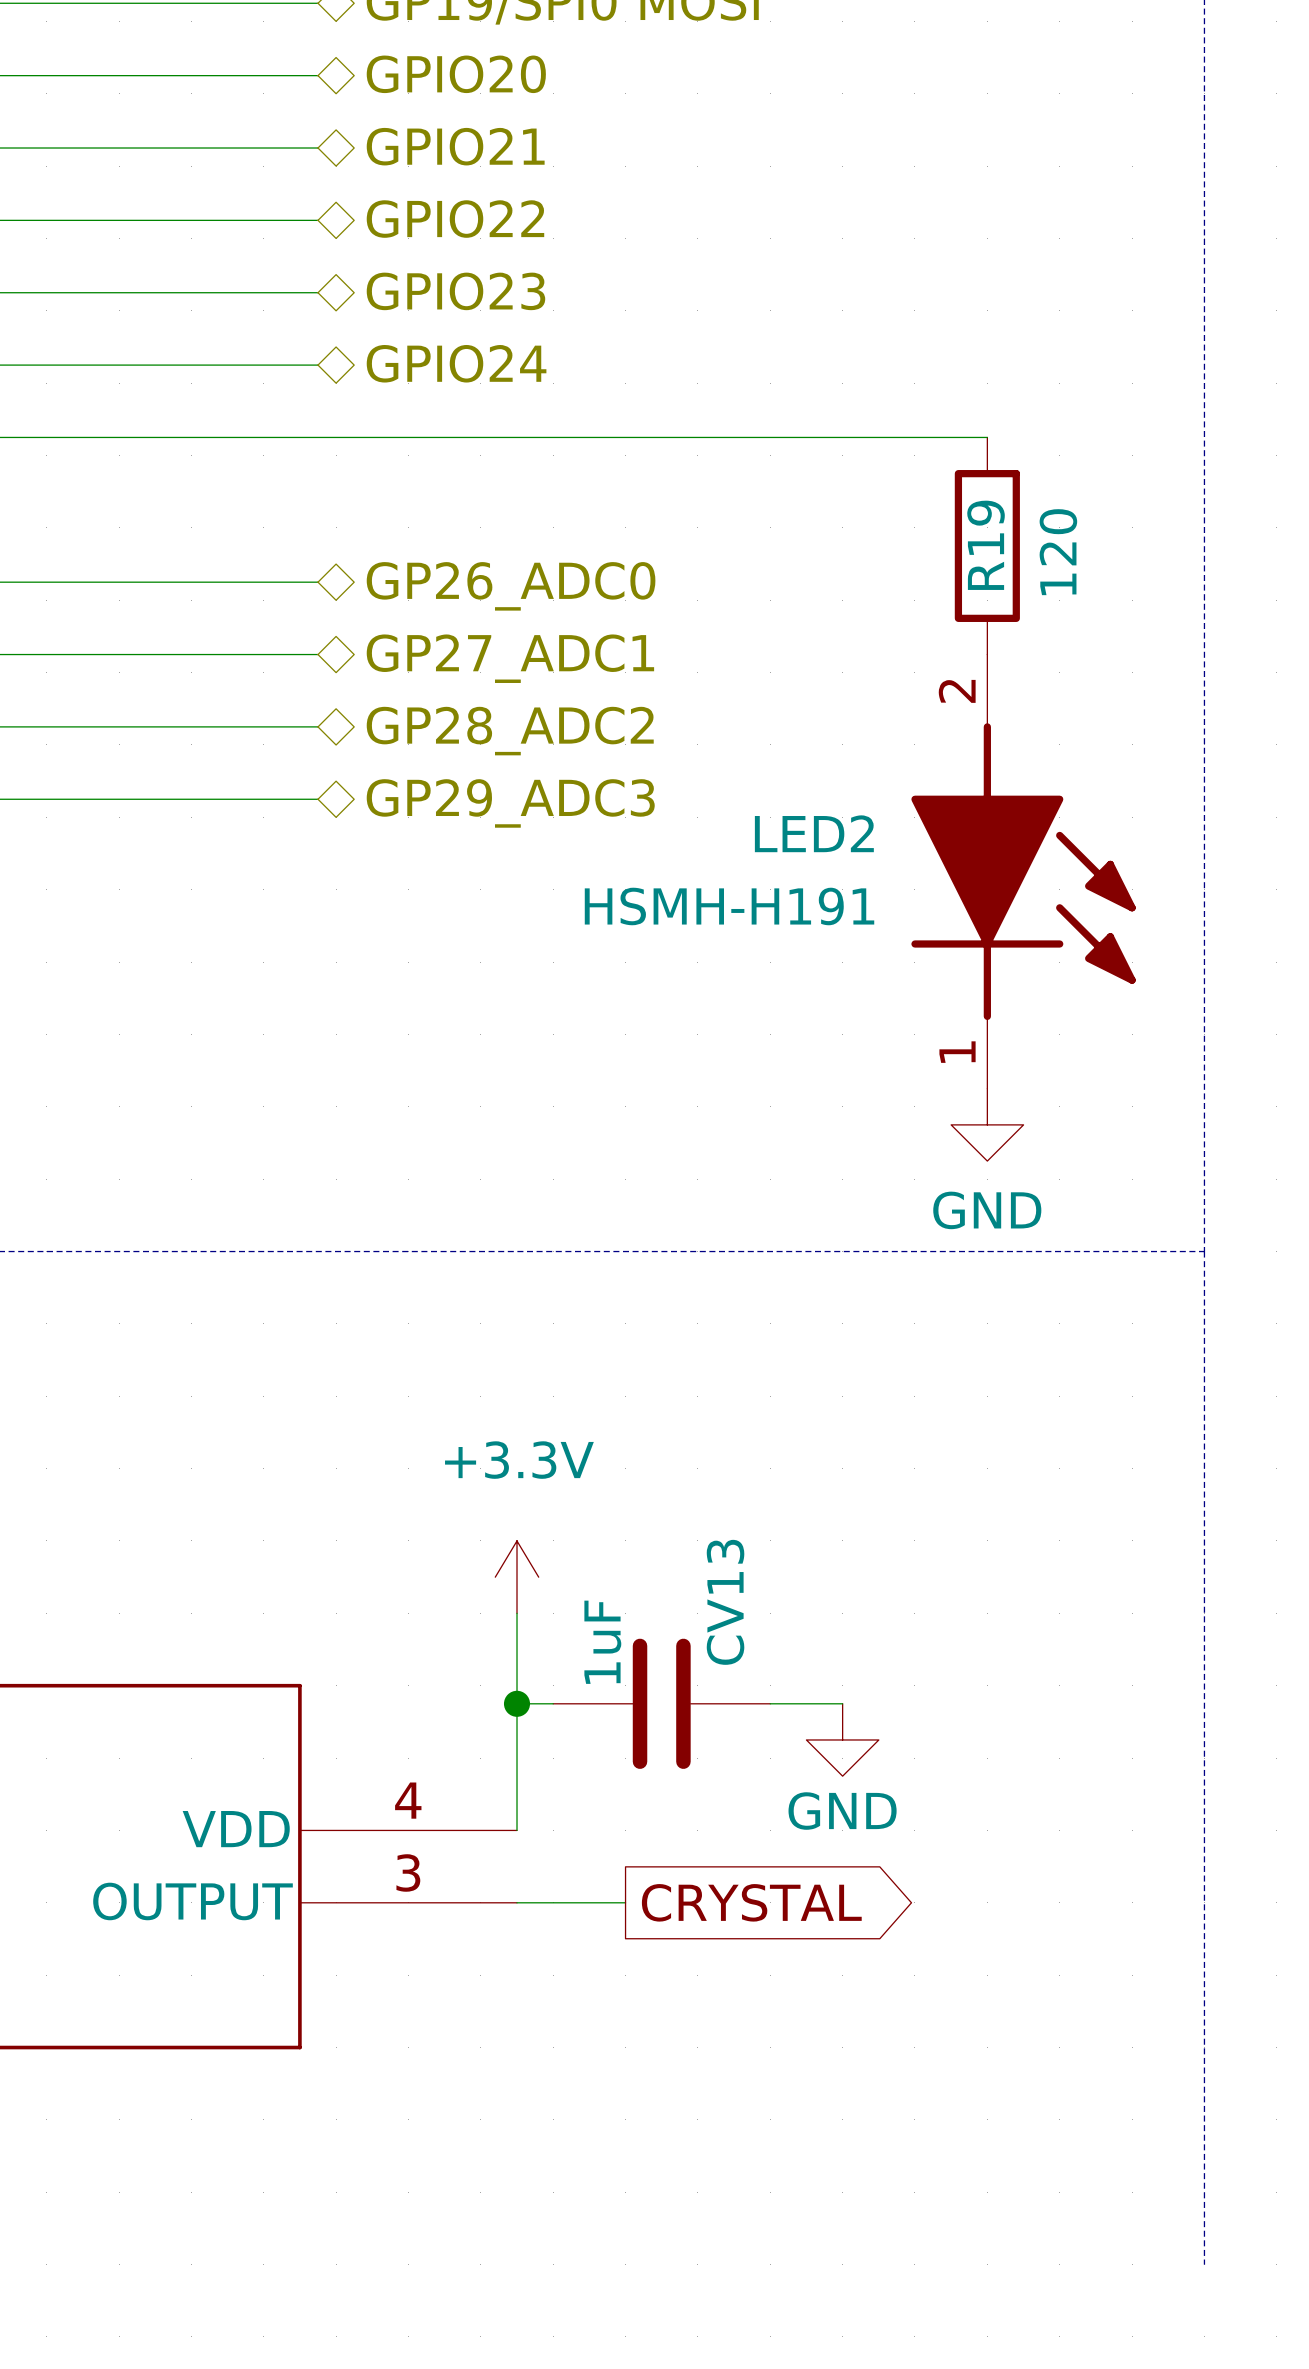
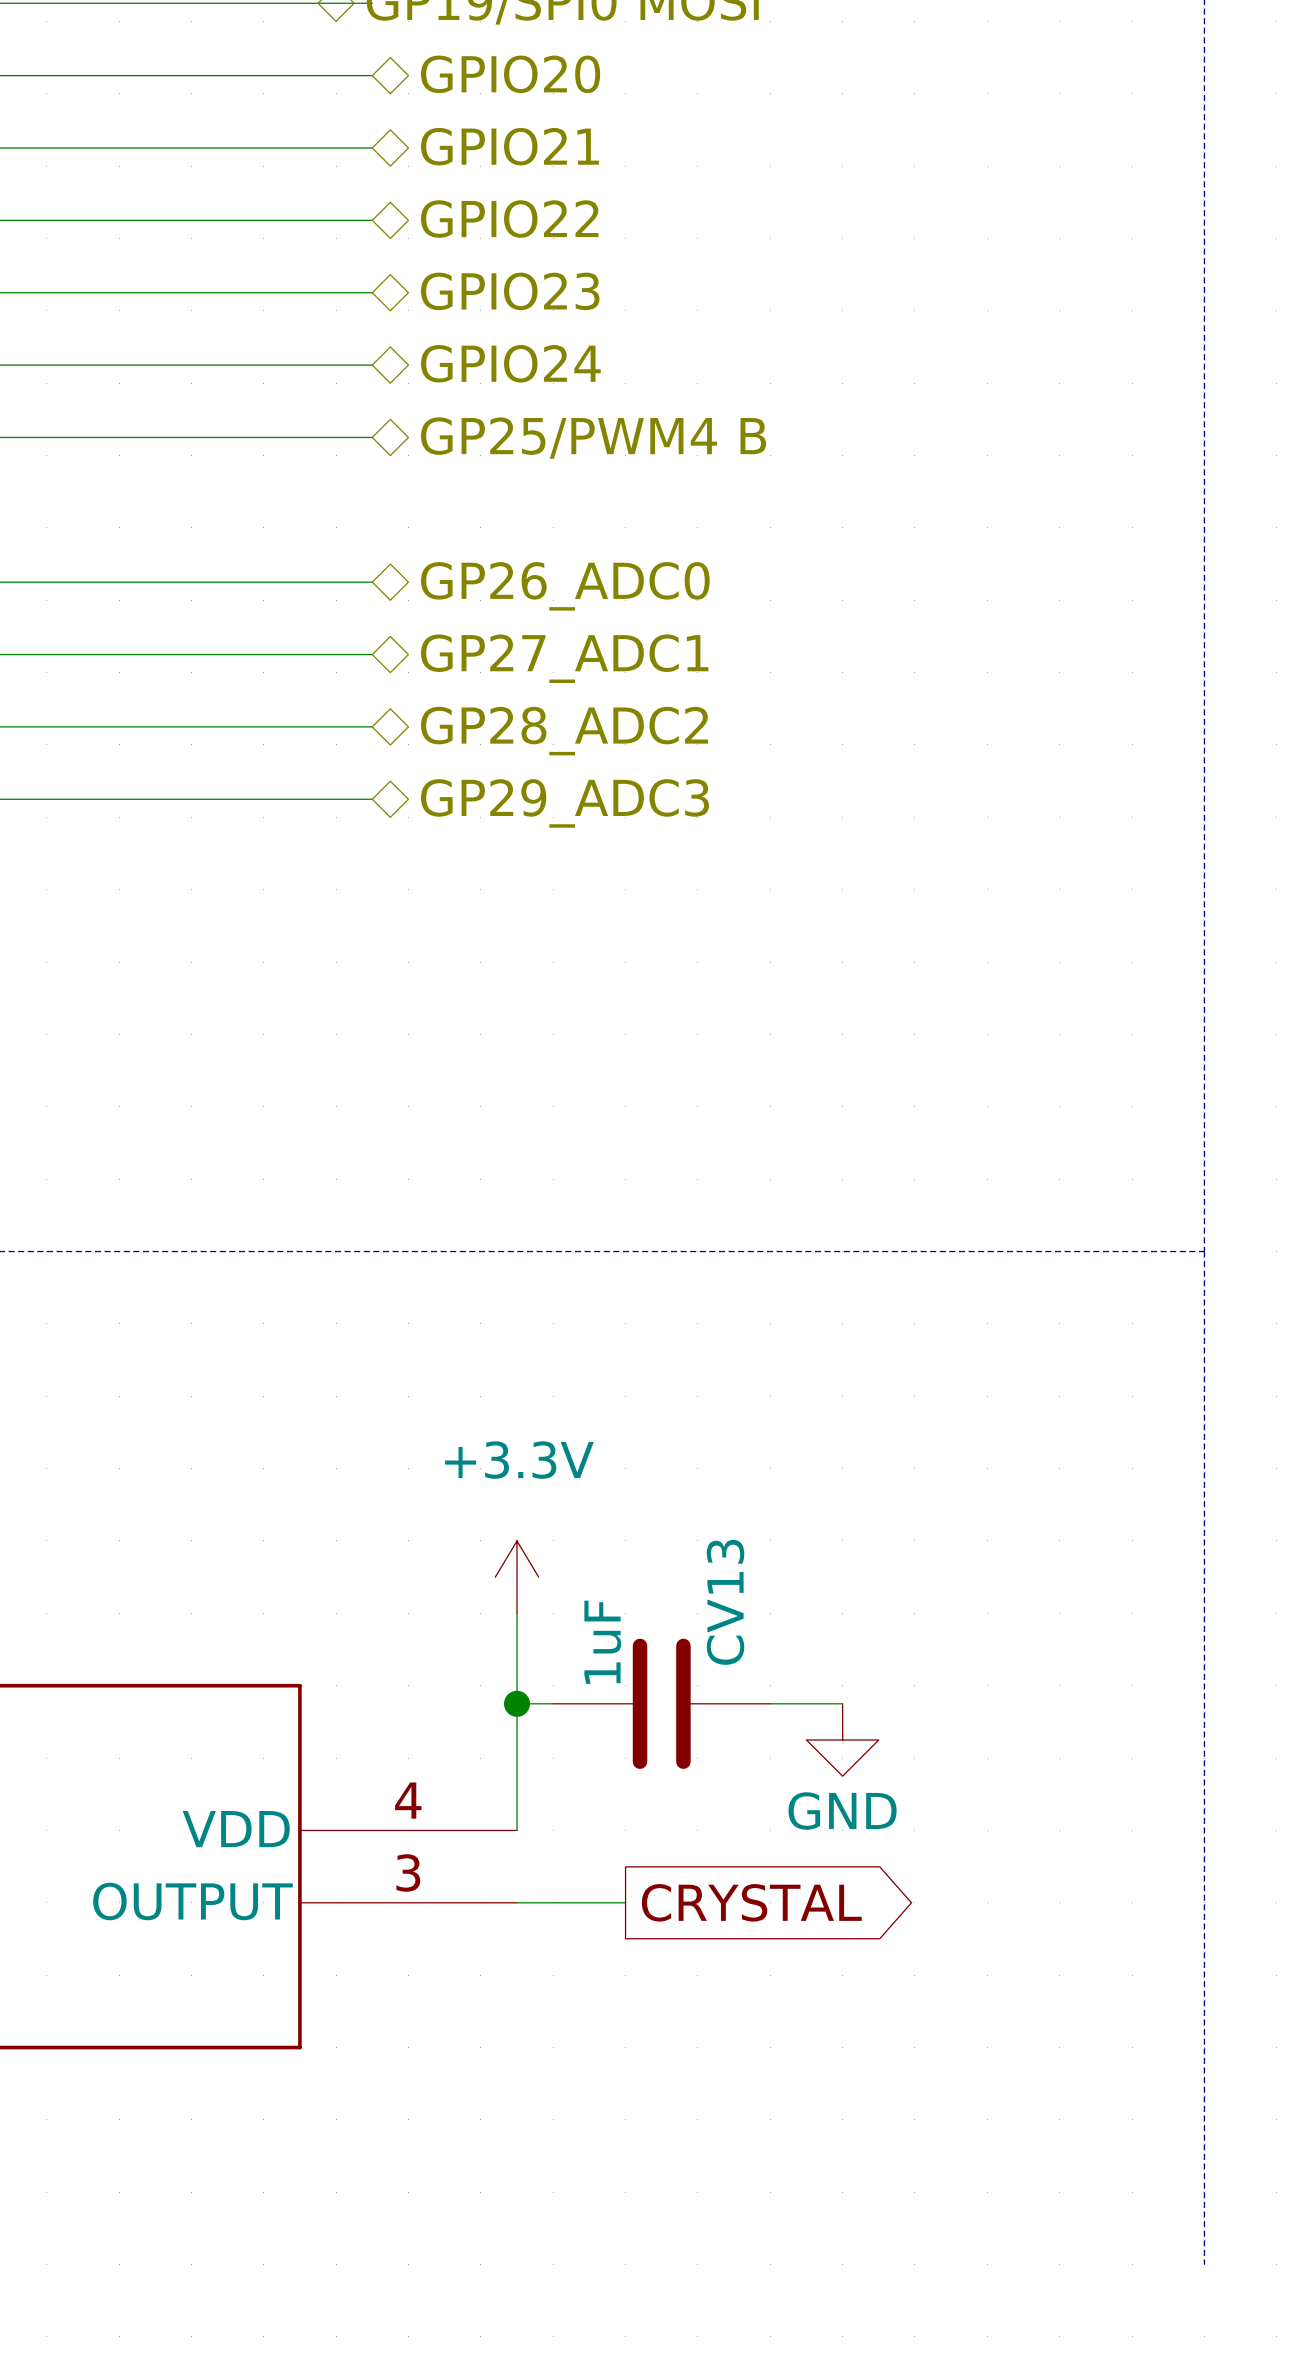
wire: none -> (318, 3) (372, 3)
hierarchical label position: GPIO20 (456, 74) -> GPIO20 (510, 74)
wire: none -> (318, 75) (372, 75)
hierarchical label position: GPIO21 (455, 146) -> GPIO21 (509, 146)
wire: none -> (318, 148) (372, 148)
hierarchical label position: GPIO22 (455, 219) -> GPIO22 (509, 219)
wire: none -> (318, 220) (372, 220)
hierarchical label position: GPIO23 (455, 291) -> GPIO23 (510, 291)
wire: none -> (318, 292) (372, 292)
hierarchical label position: GPIO24 (456, 363) -> GPIO24 (510, 363)
wire: none -> (318, 365) (372, 365)
wire: (372, 437) (987, 437) -> none
hierarchical label: none -> GP25/PWM4 B (593, 438)
R19: 120 (987, 545) -> none
wire: none -> (318, 582) (372, 582)
hierarchical label position: GP26_ADC0 (511, 586) -> GP26_ADC0 (565, 586)
wire: none -> (318, 654) (372, 654)
hierarchical label position: GP27_ADC1 (510, 658) -> GP27_ADC1 (564, 658)
wire: none -> (318, 726) (372, 726)
hierarchical label position: GP28_ADC2 (510, 731) -> GP28_ADC2 (564, 731)
wire: none -> (318, 799) (372, 799)
hierarchical label position: GP29_ADC3 (510, 803) -> GP29_ADC3 (564, 803)
LED2: HSMH-H191 (1023, 871) -> none
power symbol: GND (987, 1124) -> none

